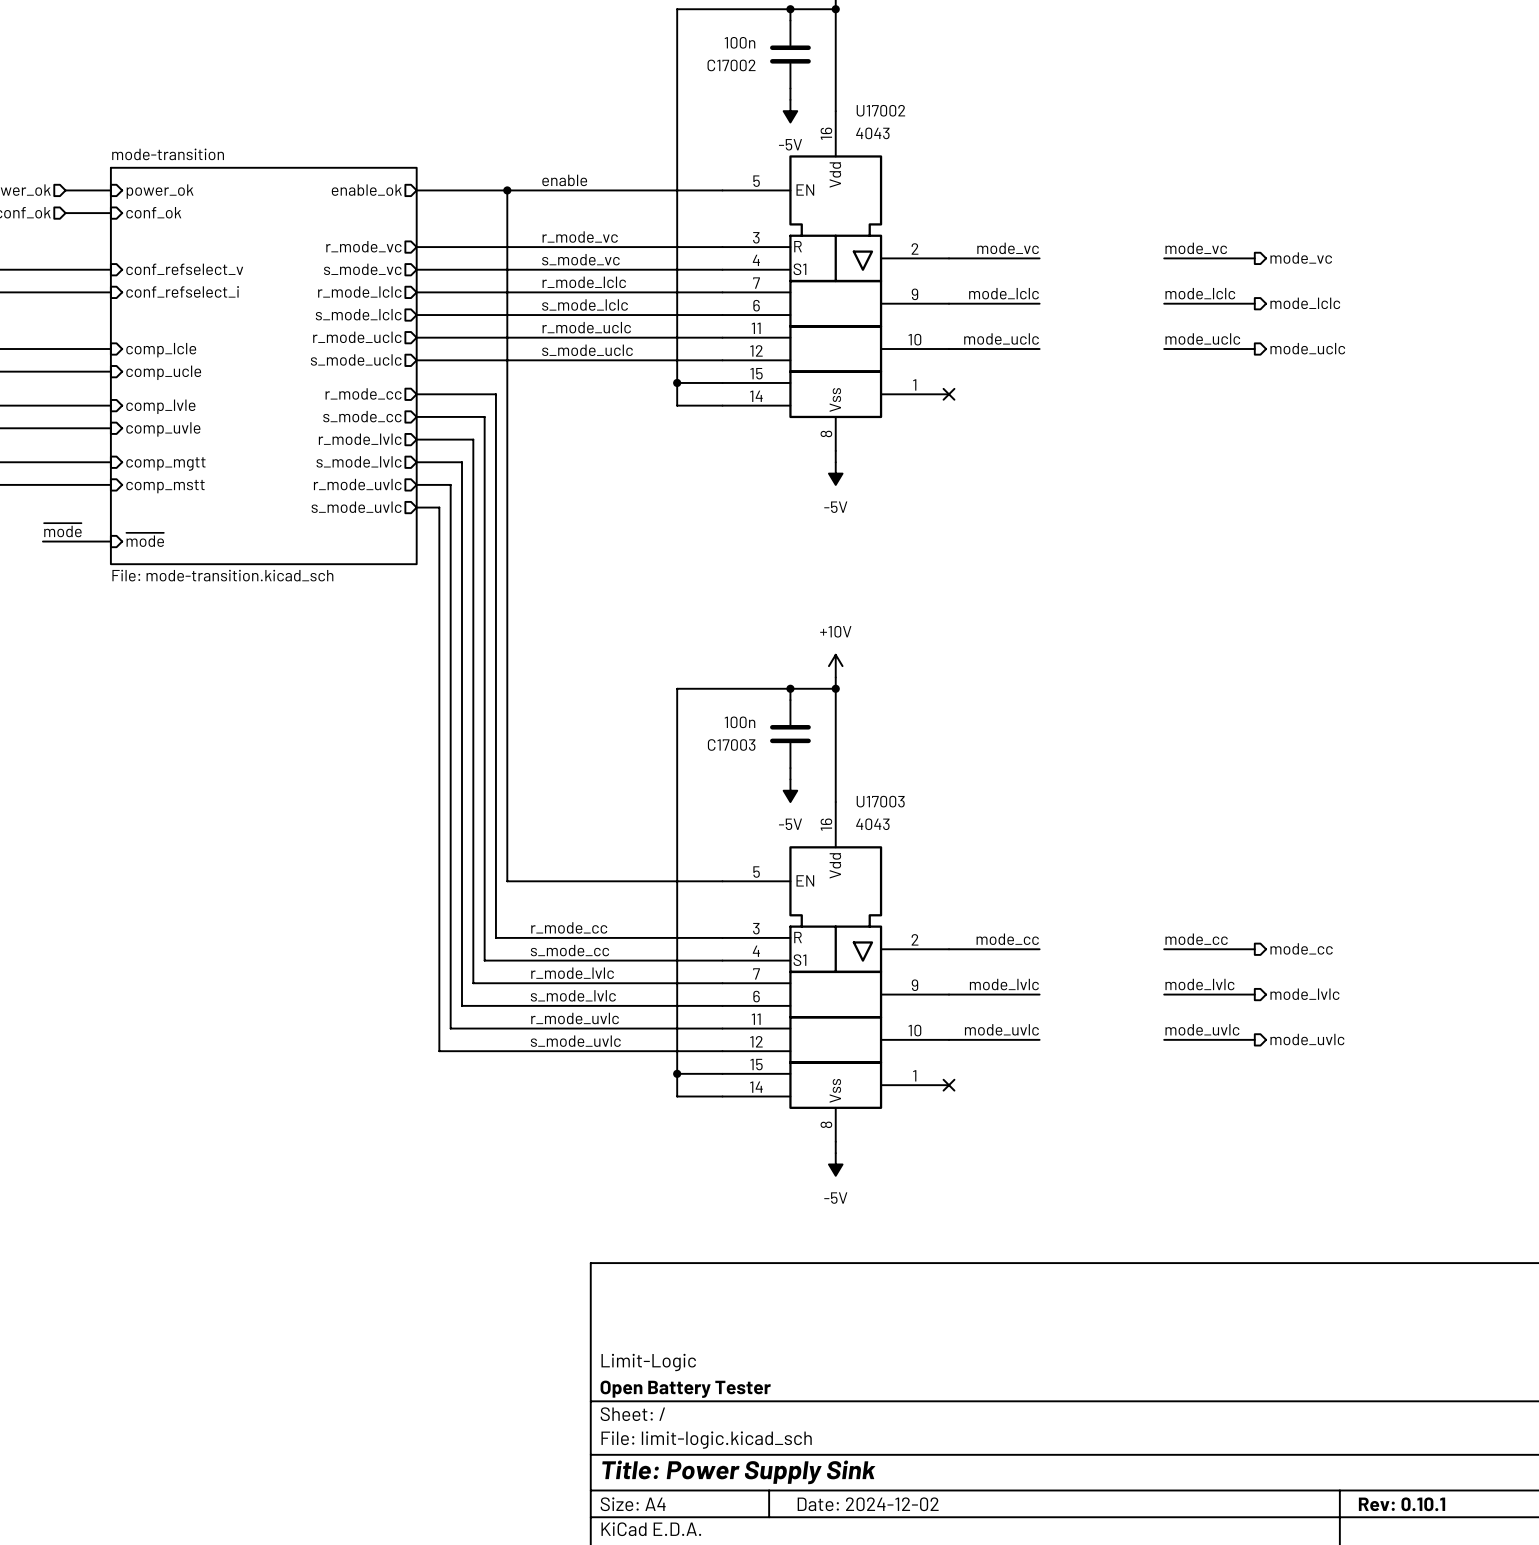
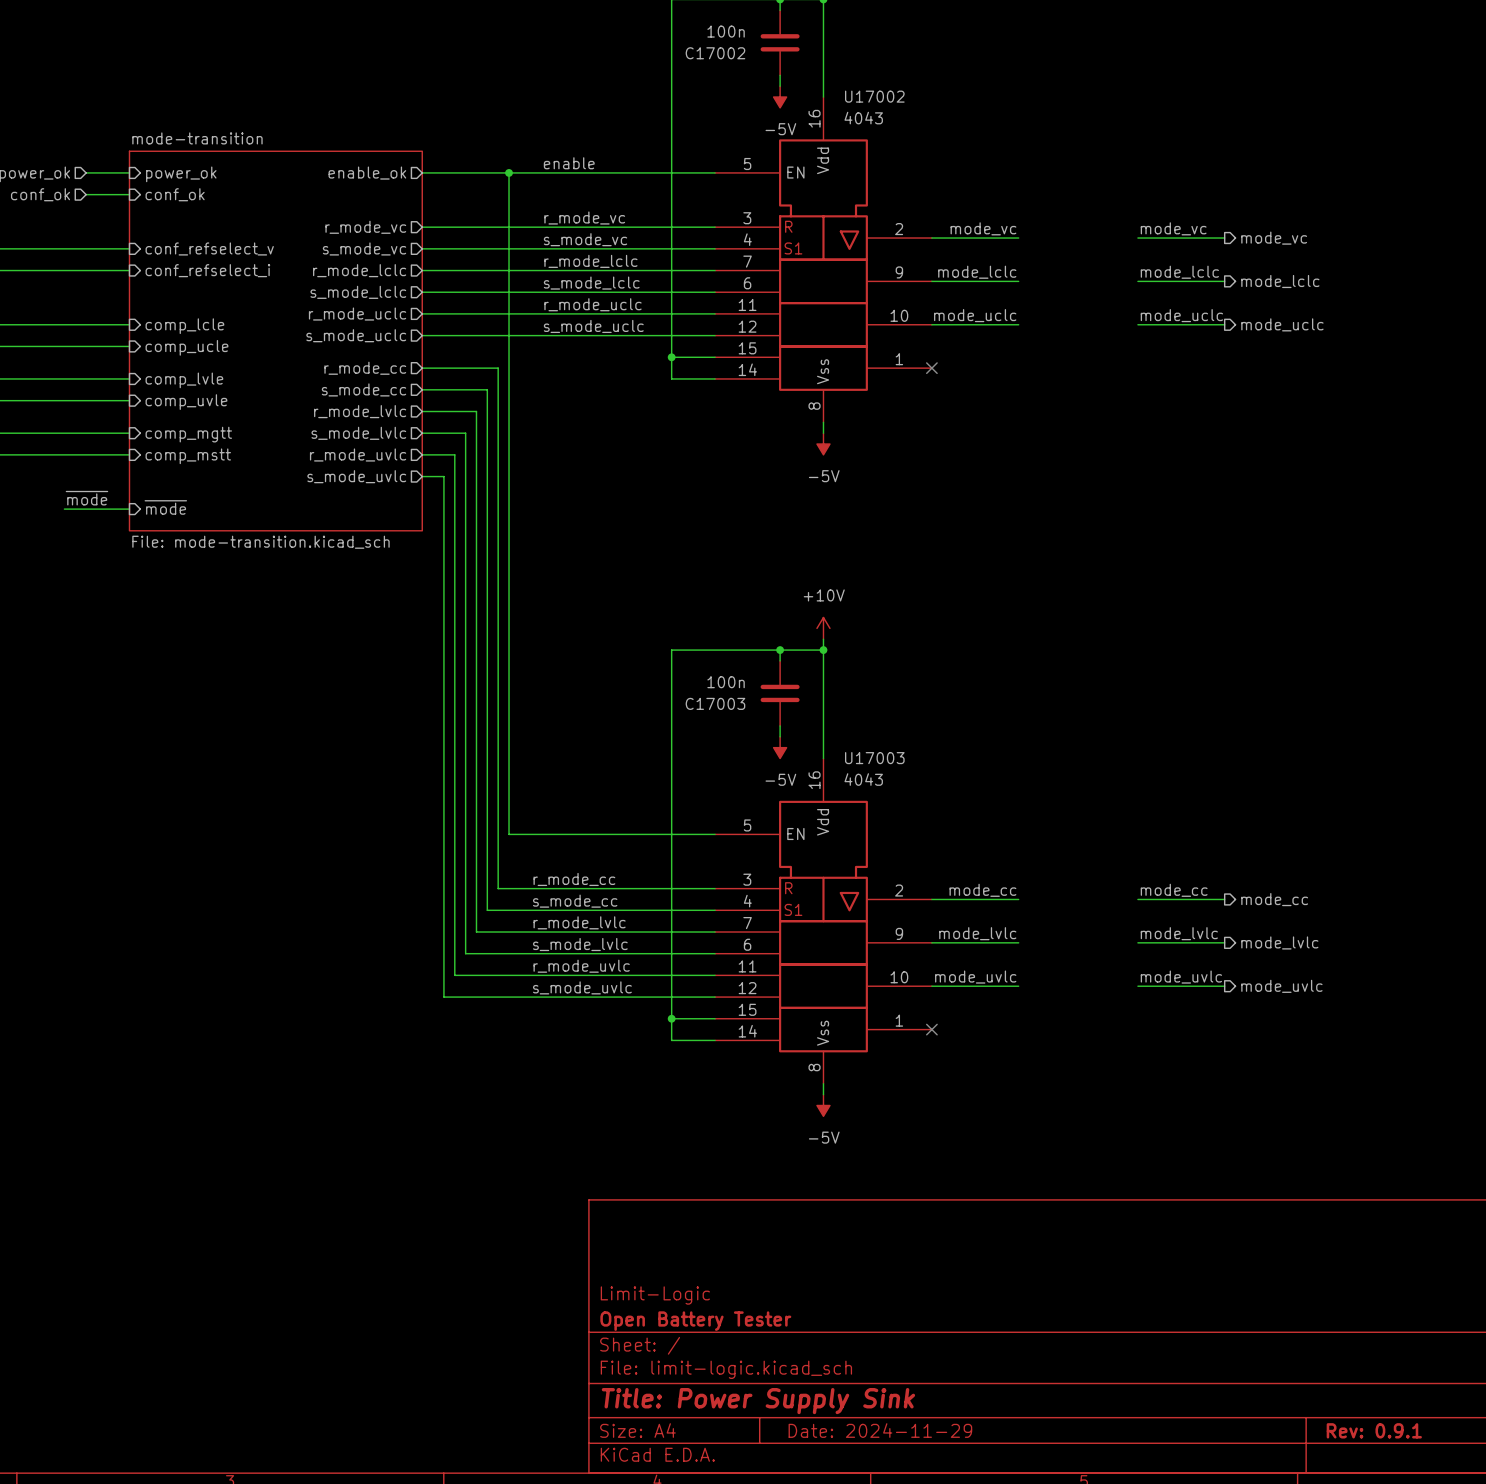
title block: Date: 2024-12-02 (868, 1504) -> Date: 2024-11-29 (880, 1430)
title block: Rev: 0.10.1 (1402, 1504) -> Rev: 0.9.1 (1374, 1430)

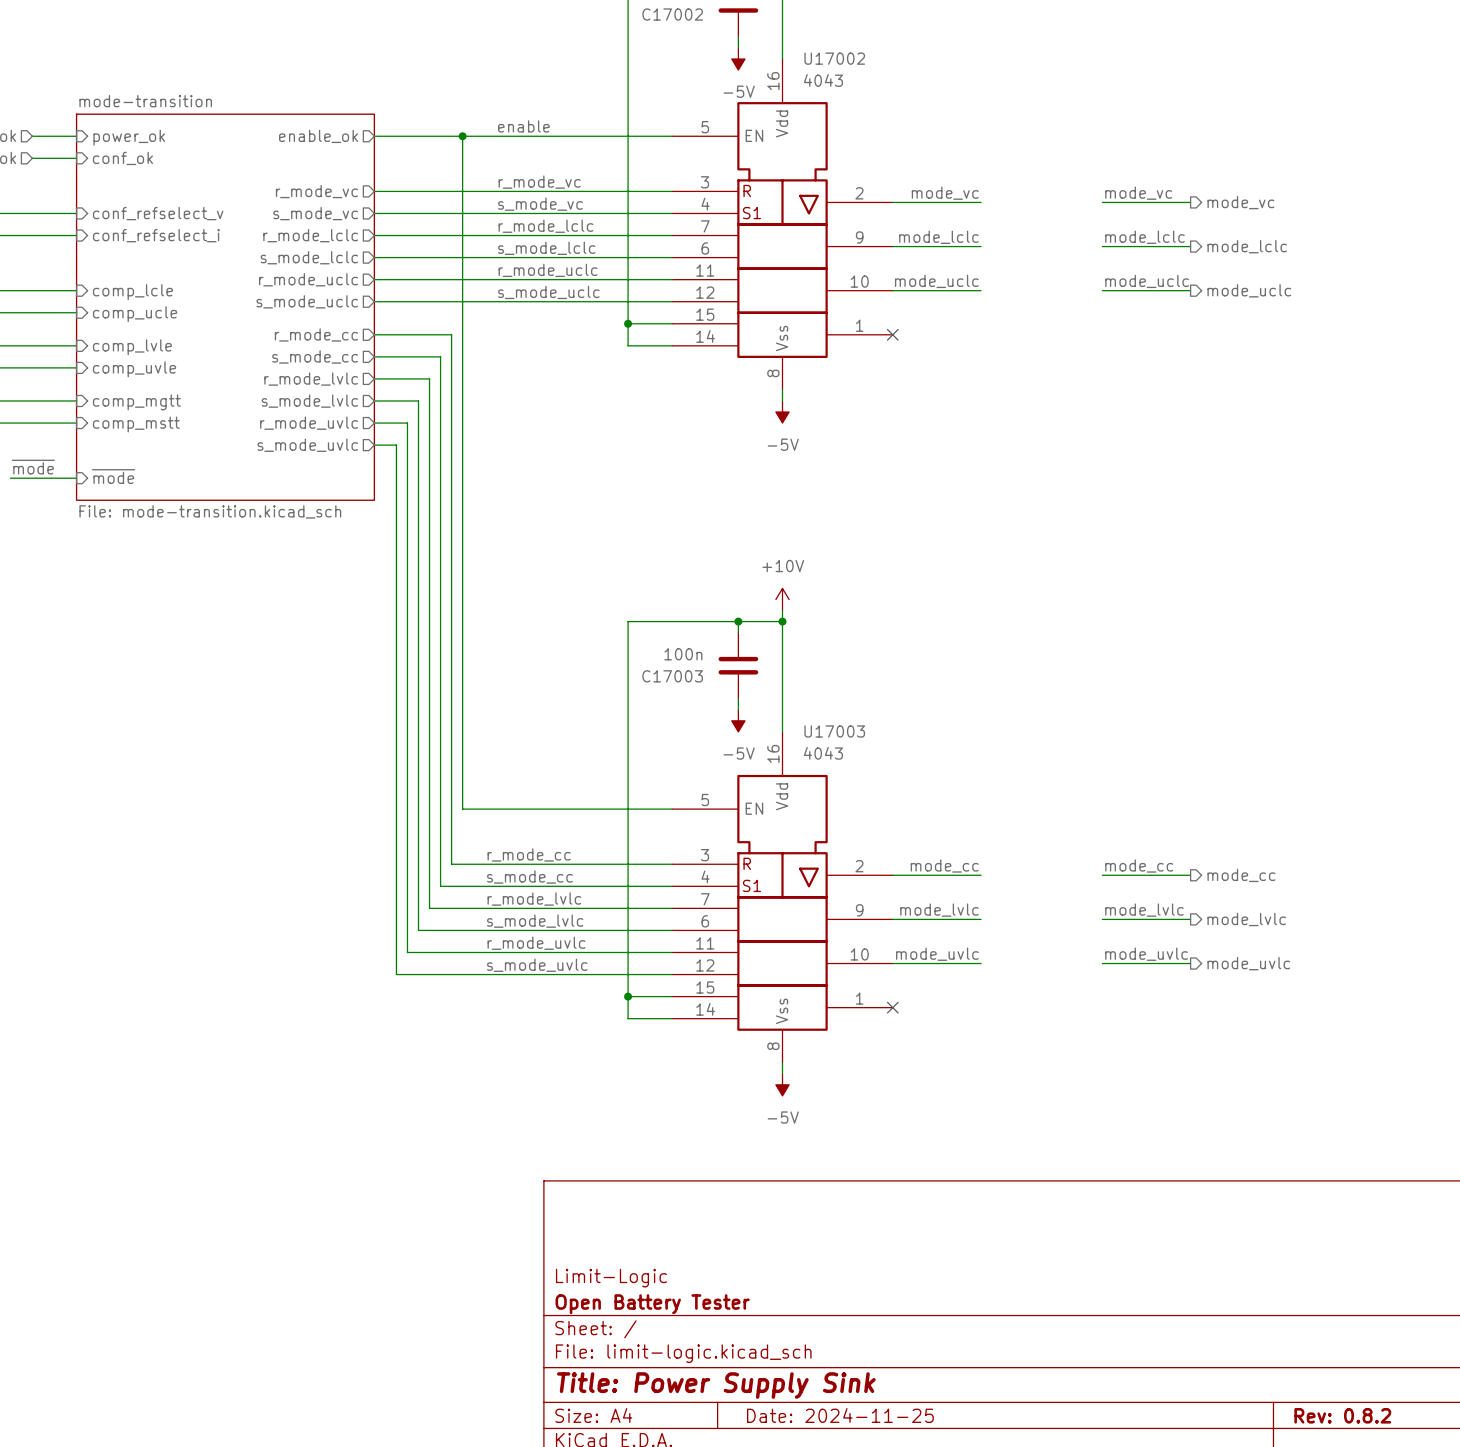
title block: Date: 2024-11-29 (880, 1430) -> Date: 2024-11-25 (840, 1415)
title block: Rev: 0.9.1 (1374, 1430) -> Rev: 0.8.2 (1342, 1415)

